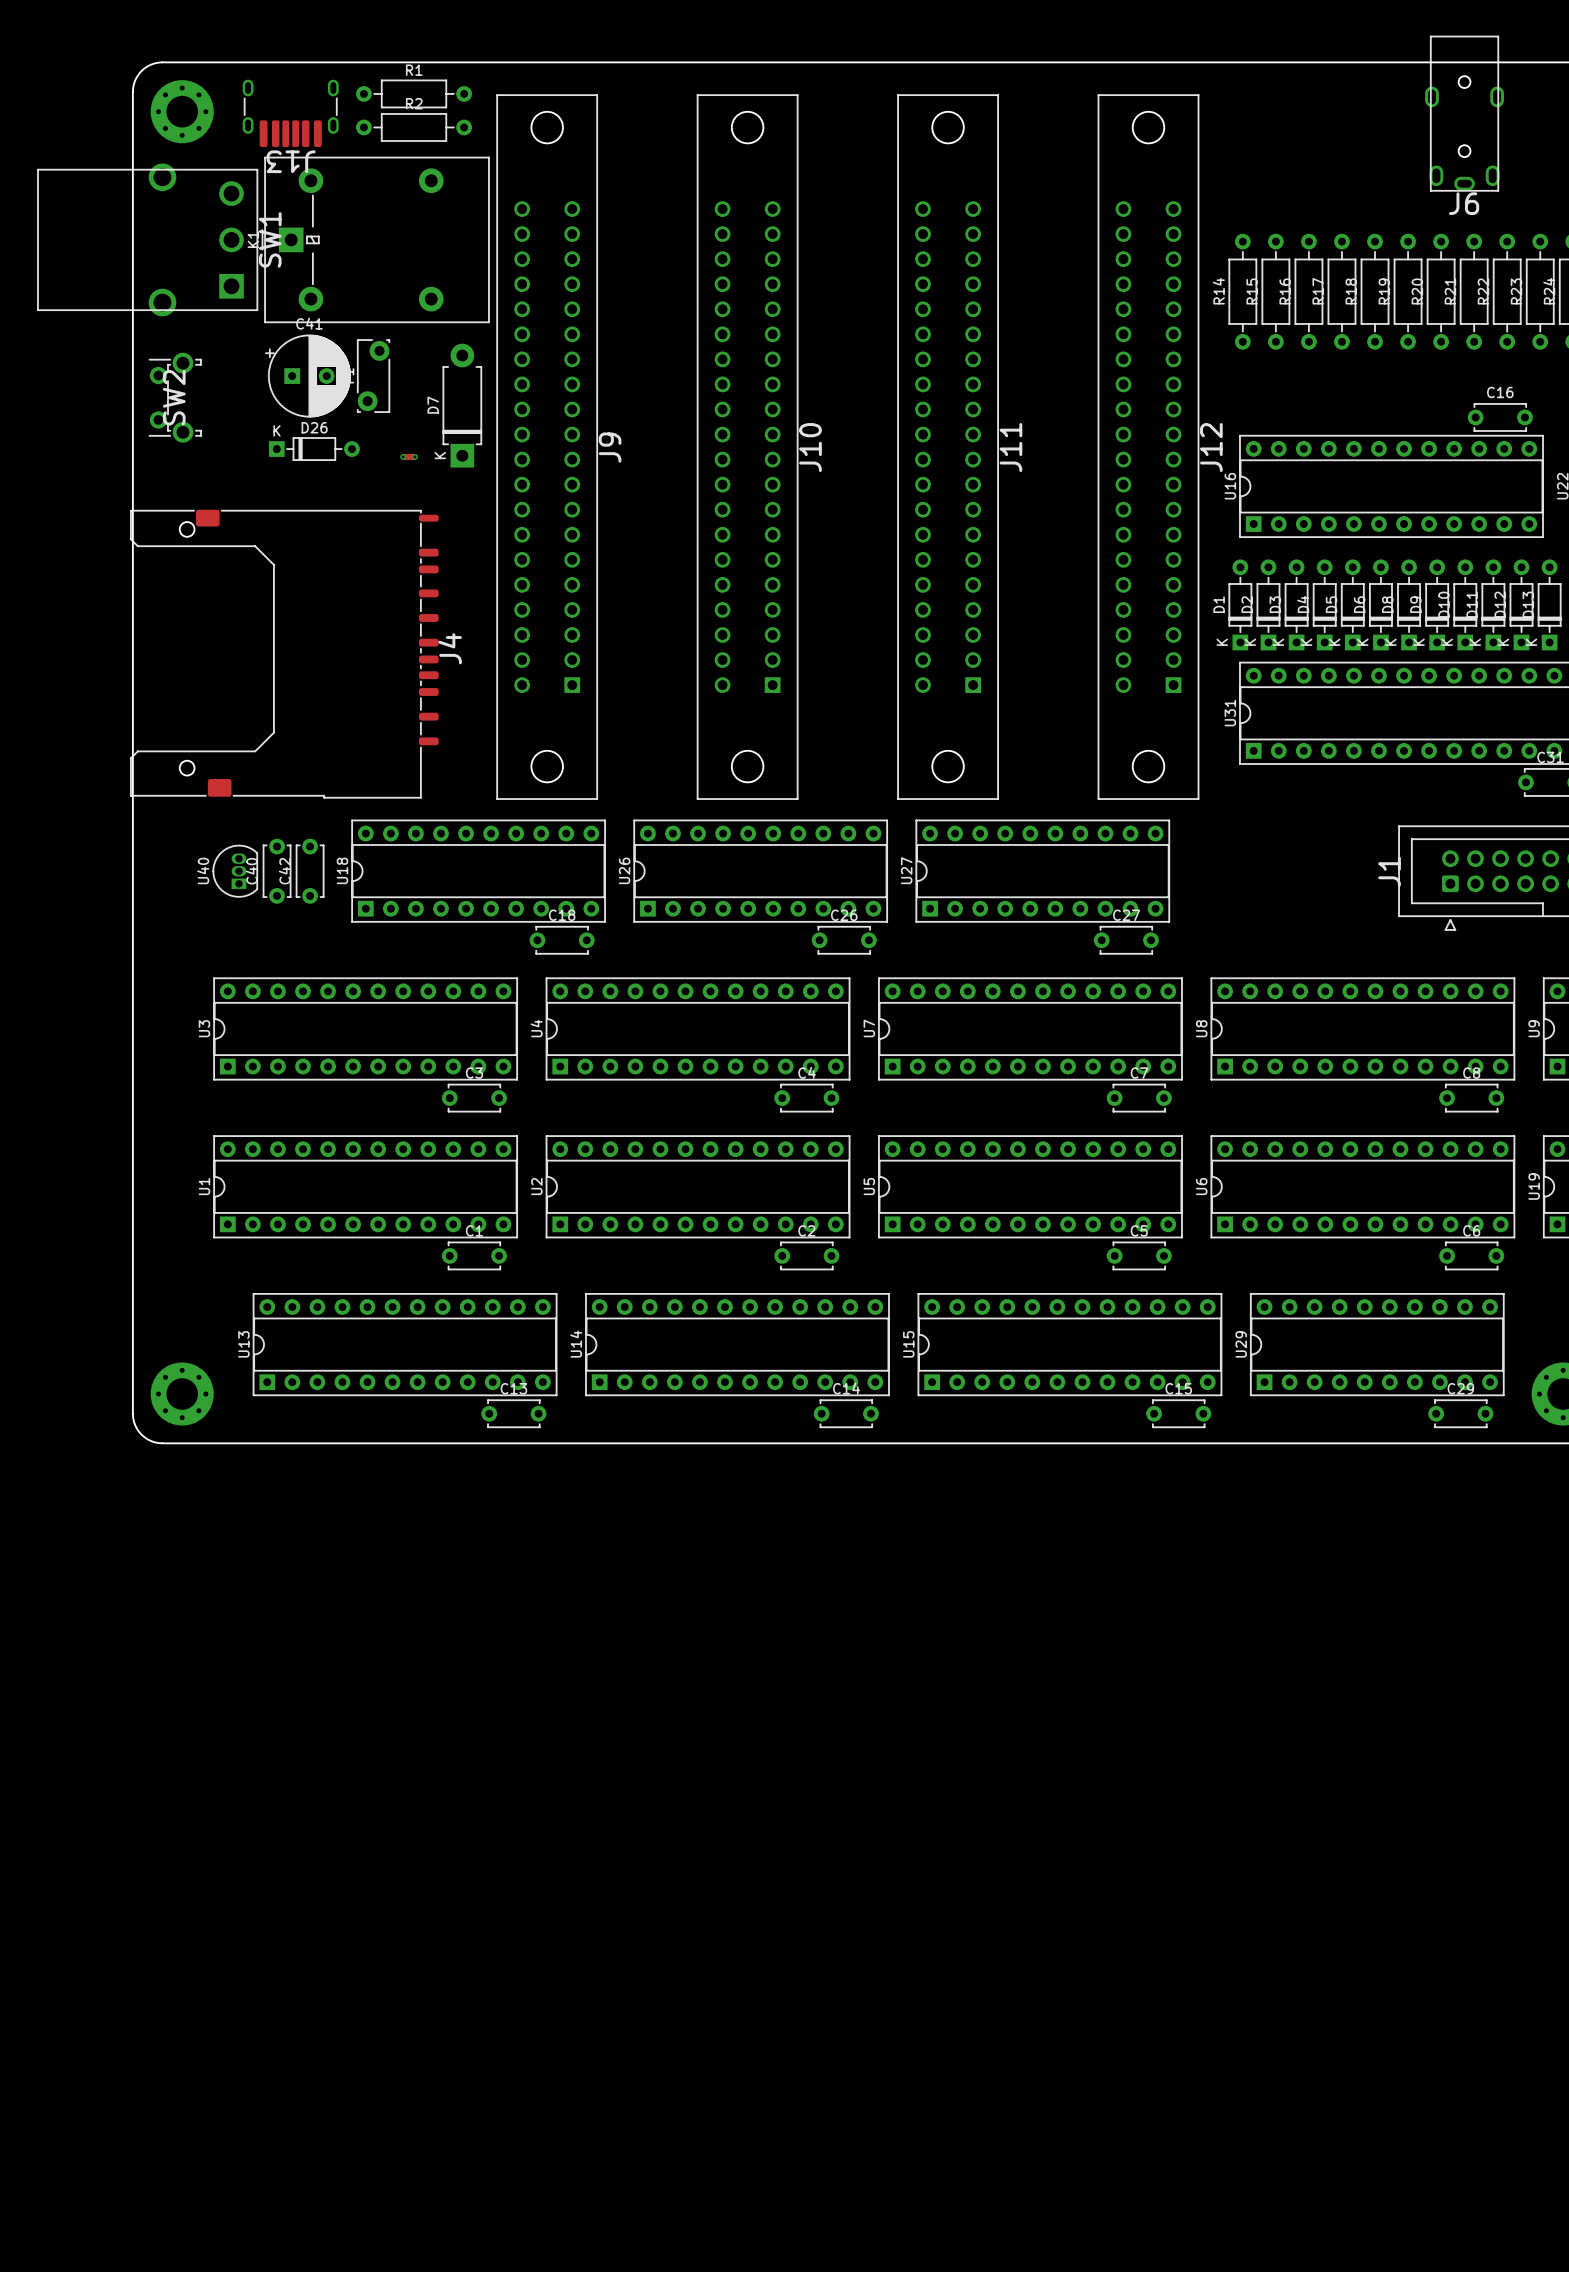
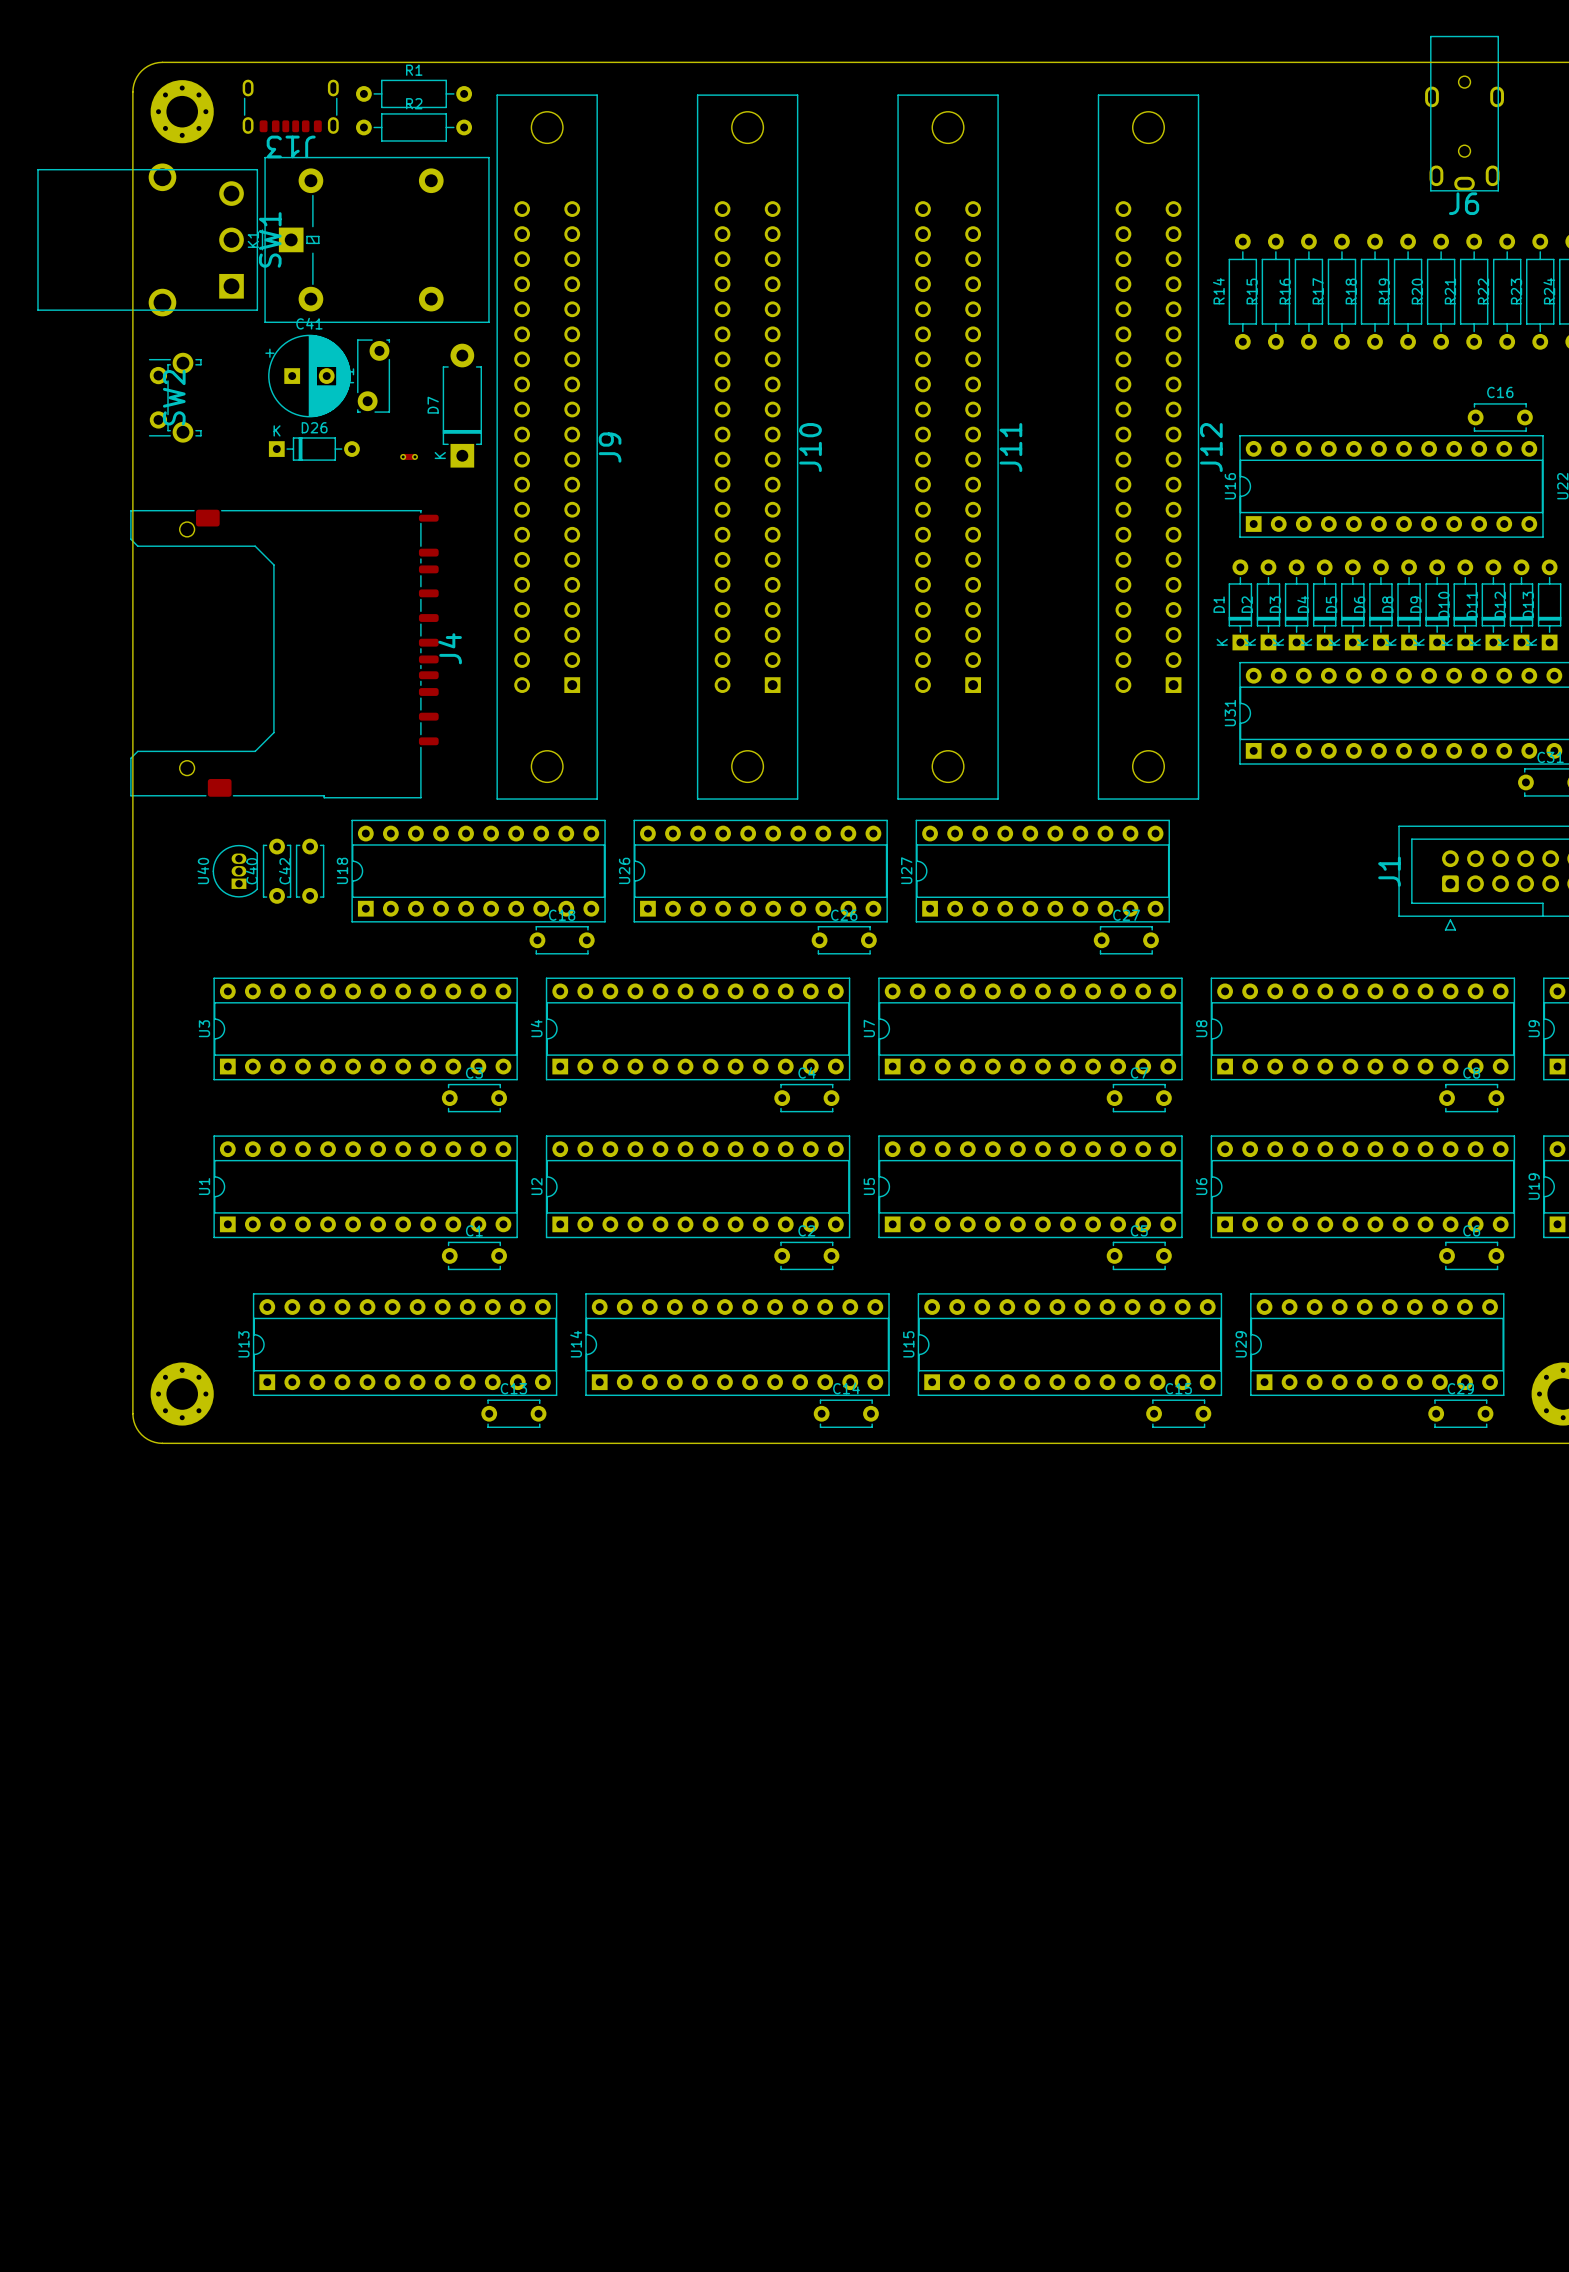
J13 footprint: [242, 79, 339, 148] -> [242, 79, 339, 134]

